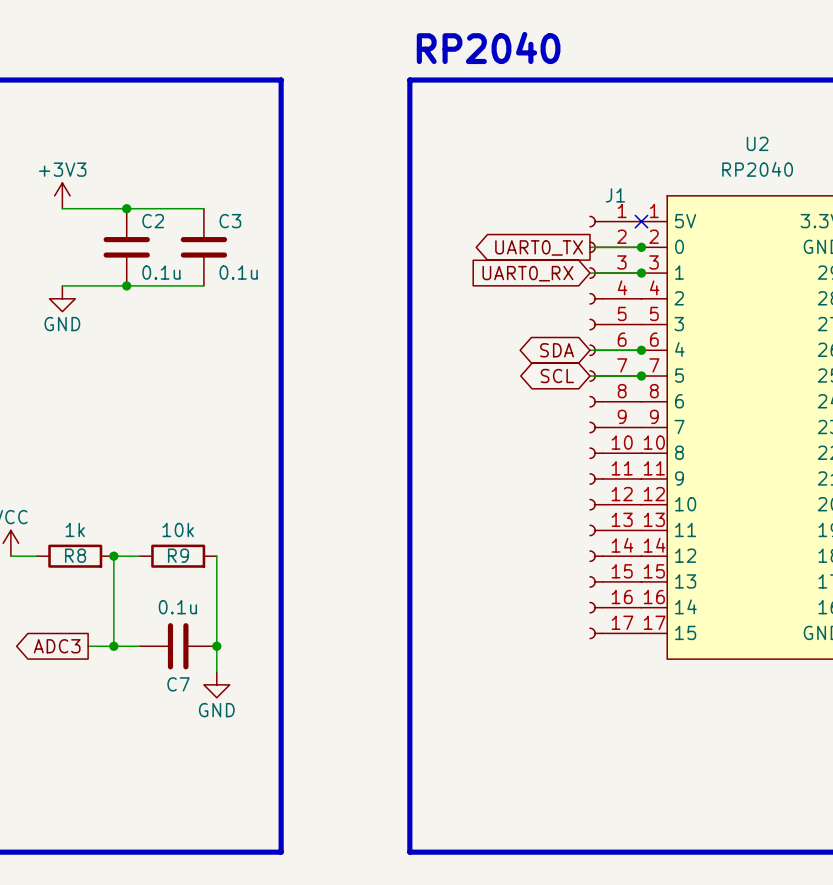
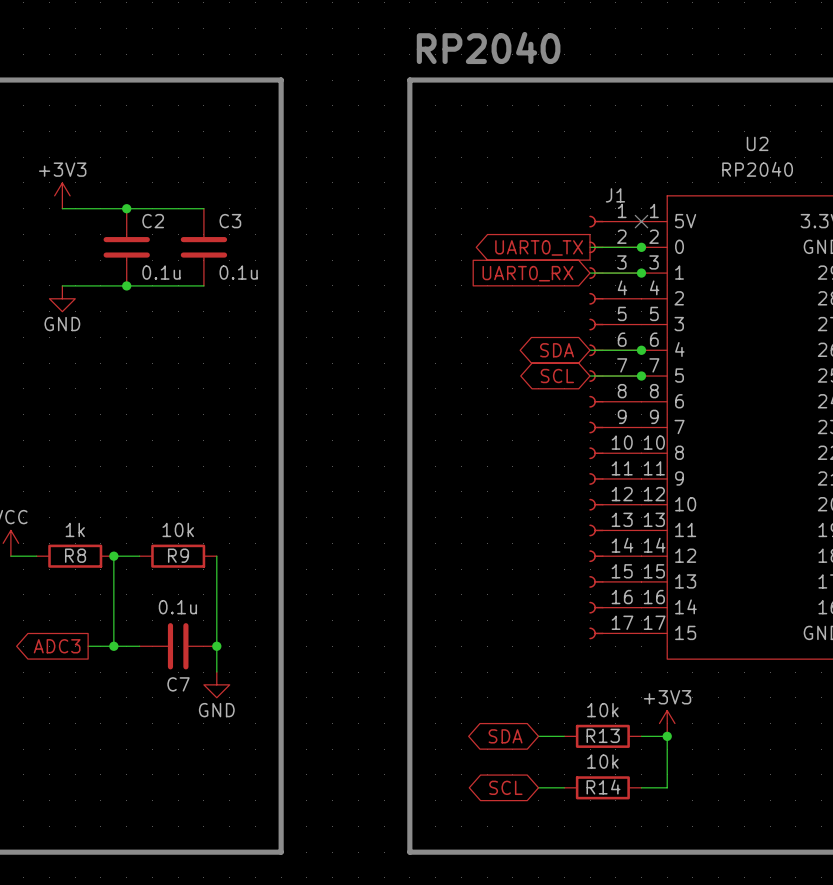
power symbol: none -> +3V3 (667, 723)
global label: none -> SDA (505, 736)
wire: none -> (538, 736) (564, 736)
R13: none -> 10k (602, 736)
wire: none -> (641, 736) (667, 736) (667, 787) (641, 787)
junction: none -> (667, 736)
global label: none -> SCL (505, 787)
wire: none -> (538, 787) (564, 787)
R14: none -> 10k (602, 787)

